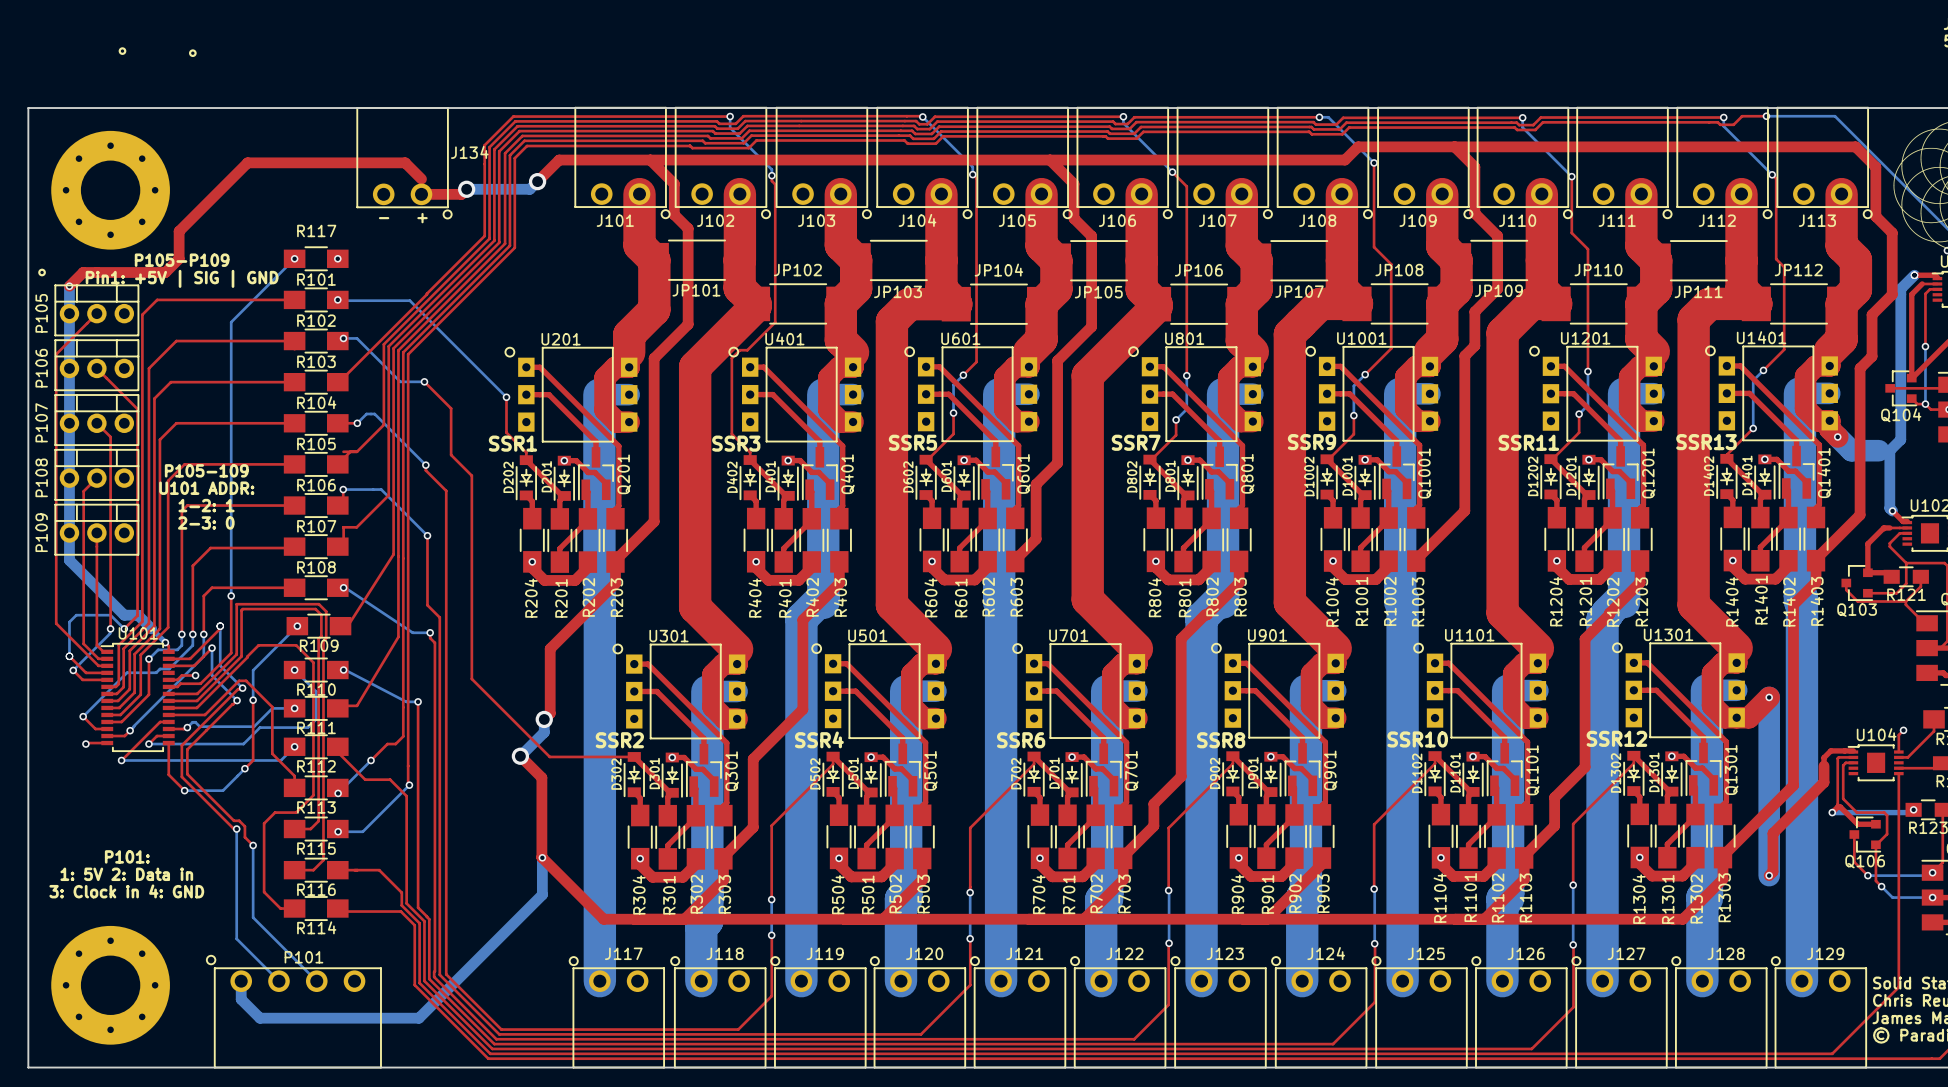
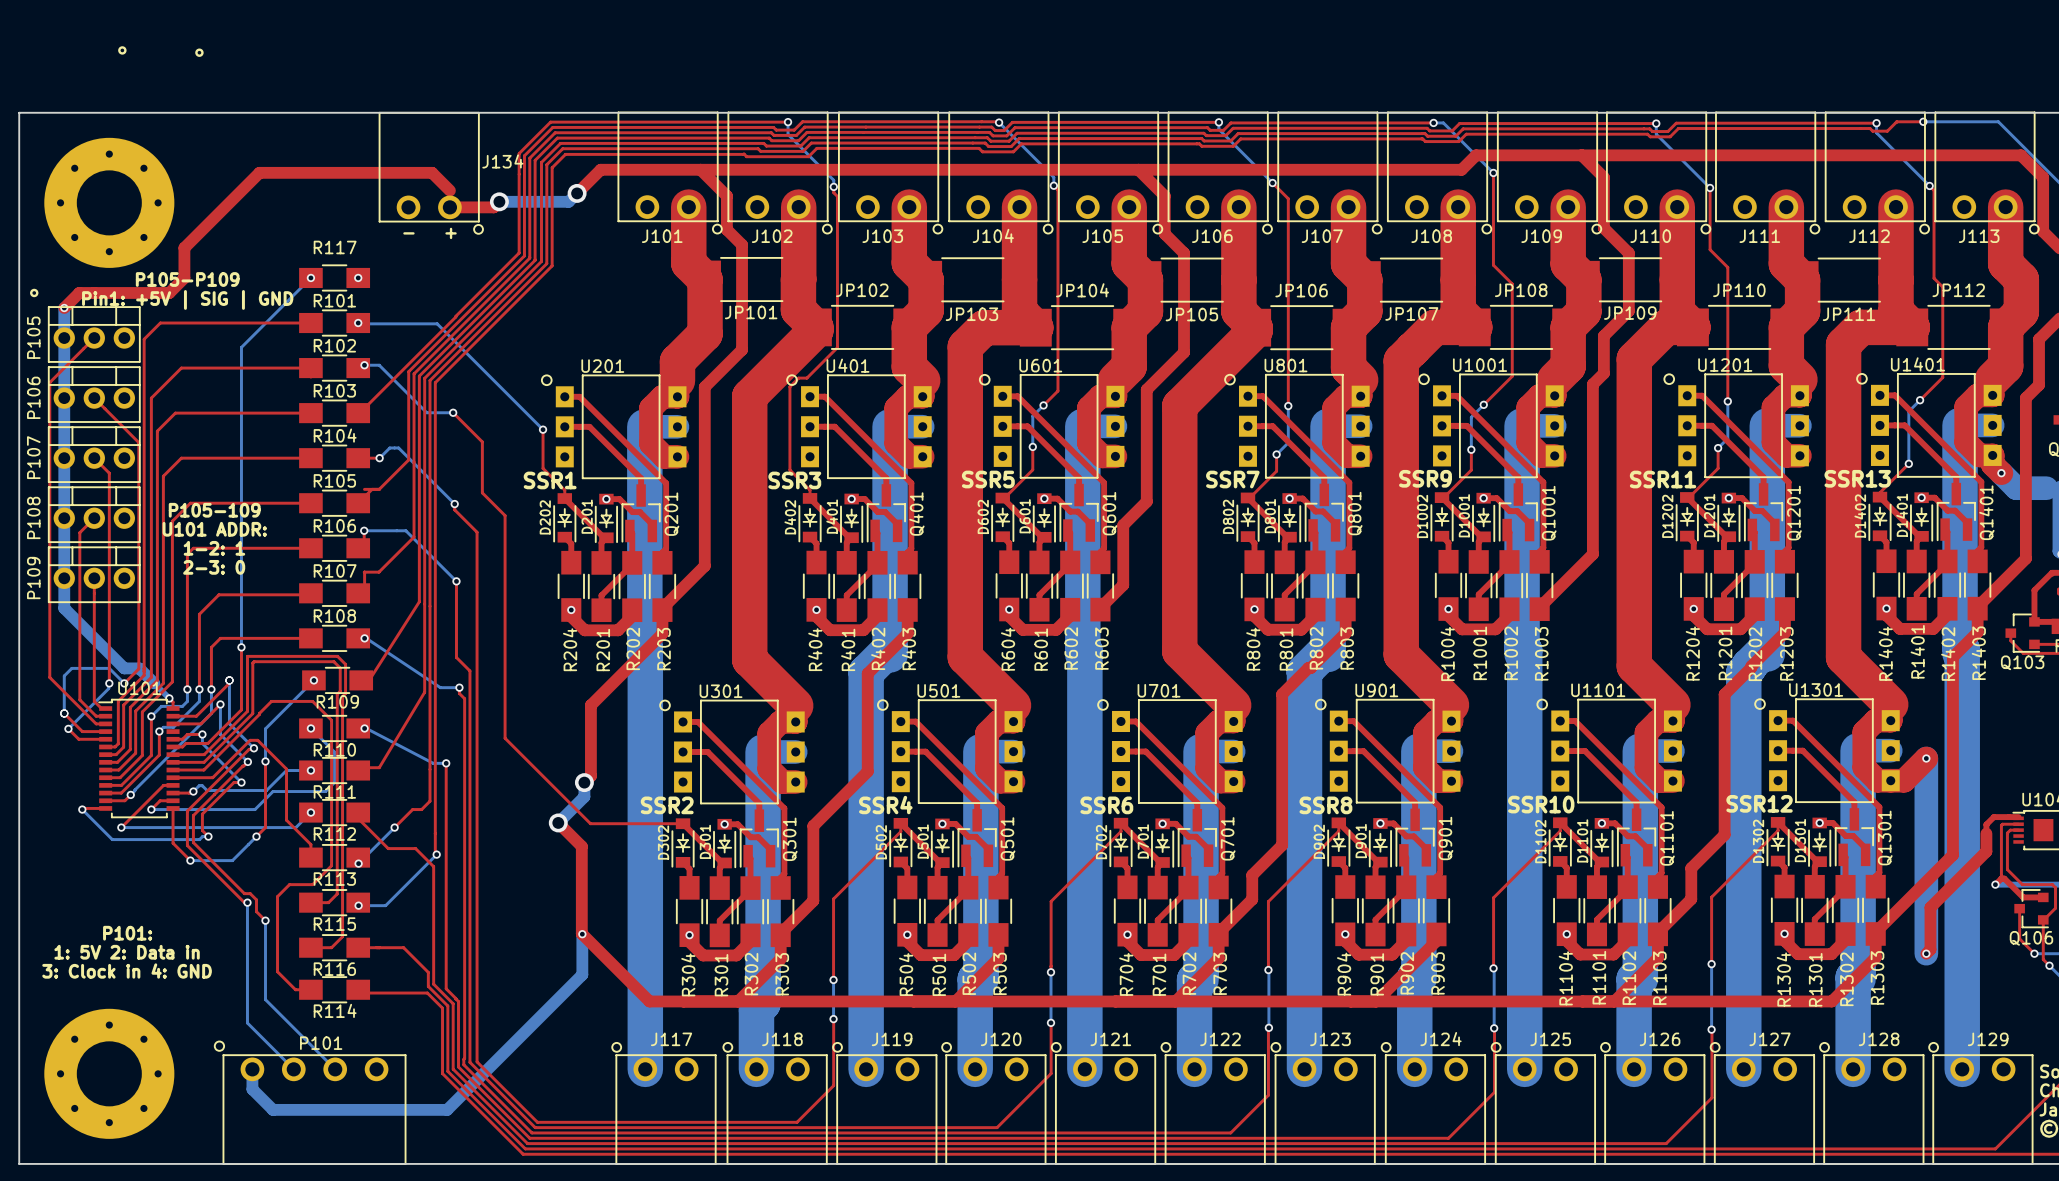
bottom track: (156, 672) (127, 672) (83, 716) -> none
via: none -> (159, 731)
bottom track: none -> (202, 734) (202, 743) (241, 782)
top track: (83, 716) (95, 729) (107, 729) -> (159, 731) (159, 755) (121, 793) (105, 793)
via: (83, 716) -> none
top track: none -> (241, 782) (233, 782) (202, 814) (202, 830) (208, 836)
via: none -> (241, 782)
bottom track: none -> (82, 809) (112, 839) (199, 839) (202, 836) (208, 836)
via: none -> (208, 836)

